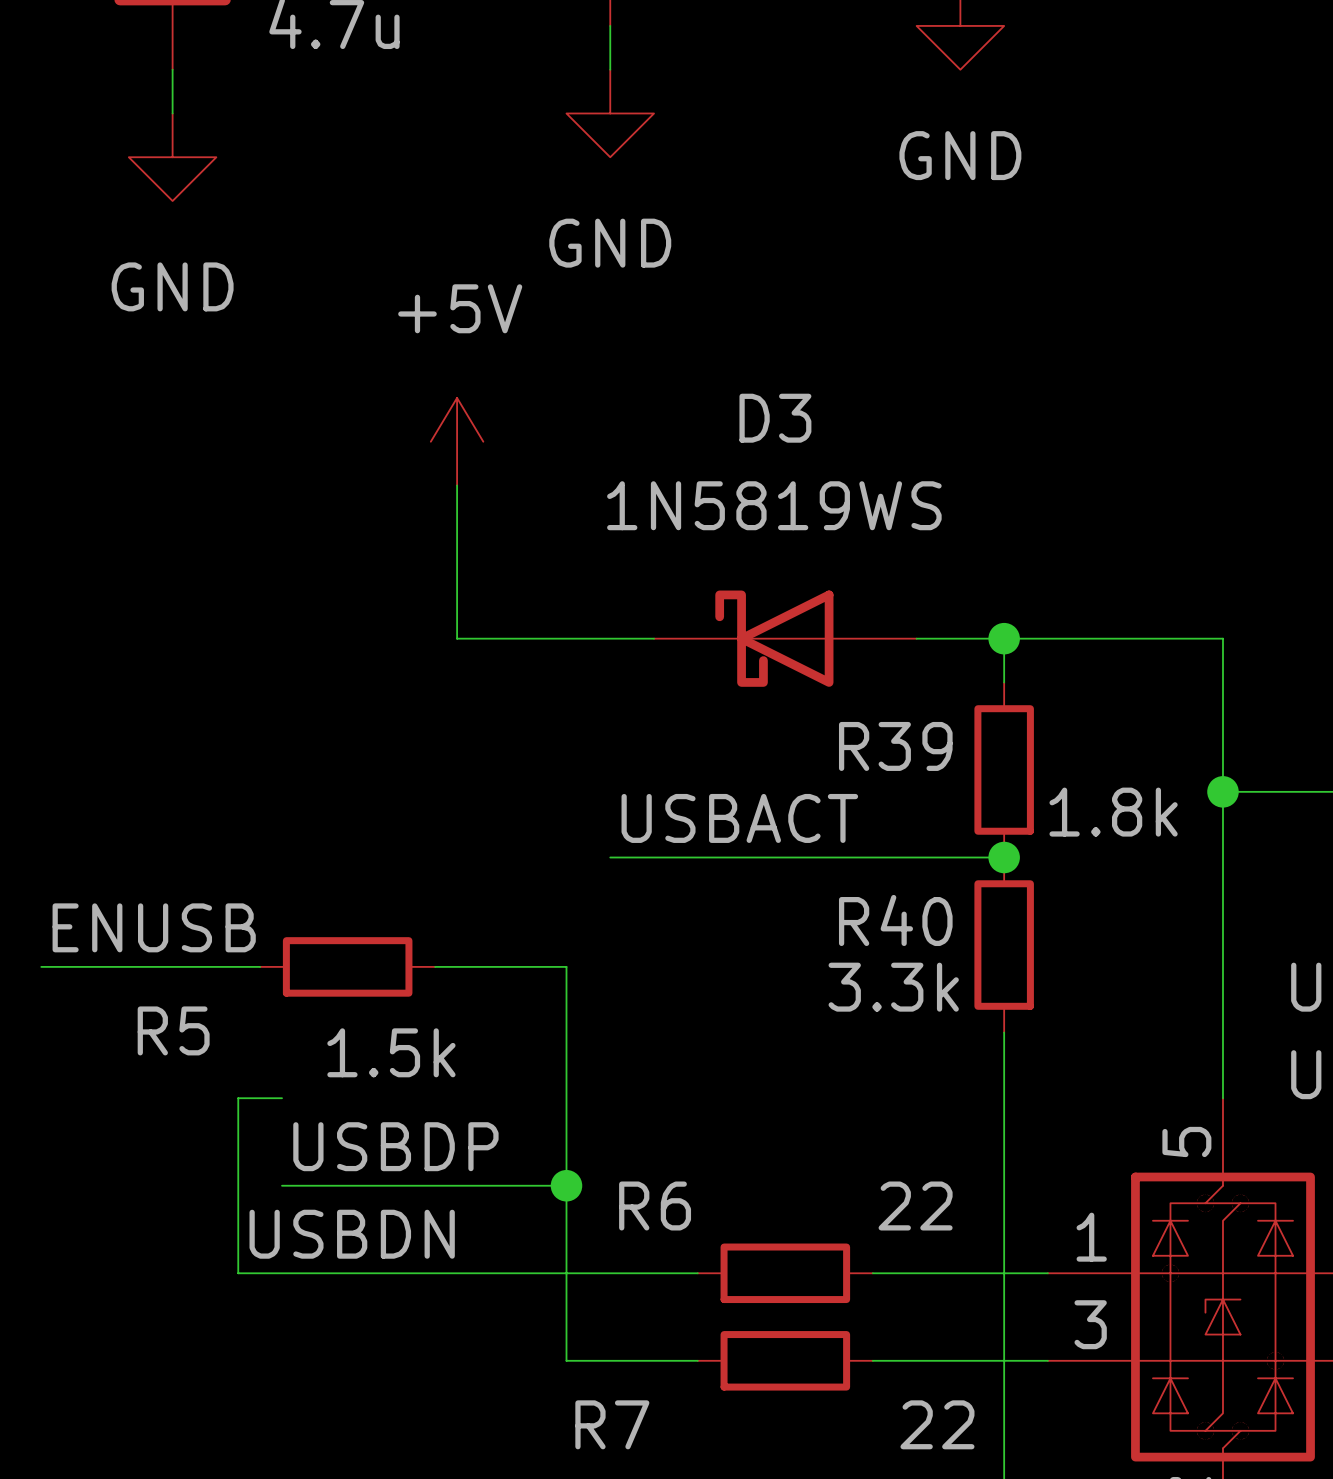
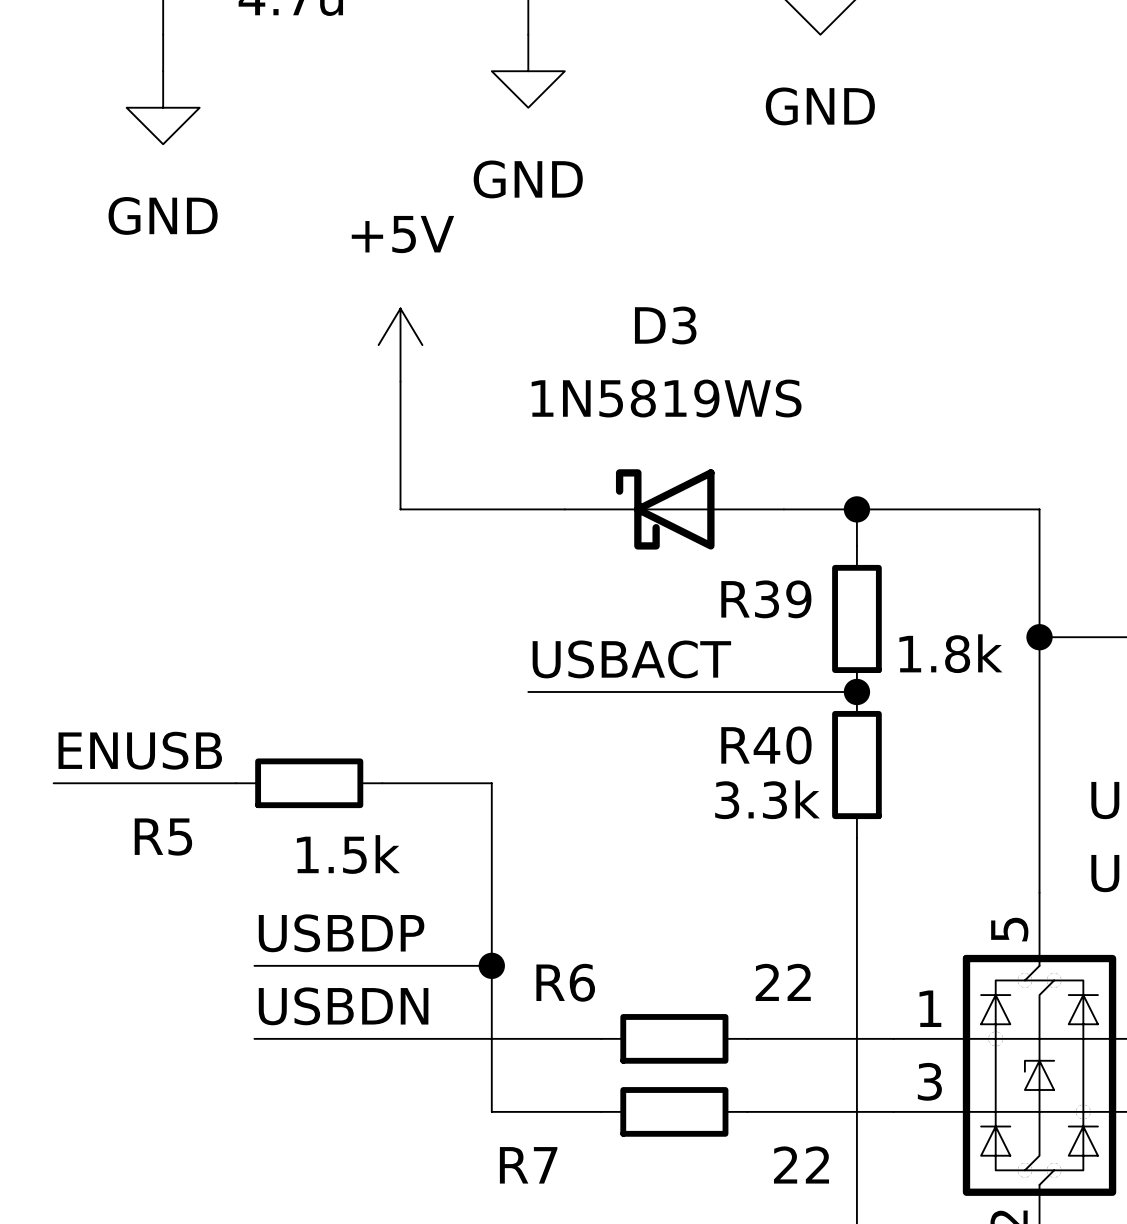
wire: (282, 1098) (238, 1098) (238, 1273) (282, 1273) -> none
label position: USBDN (352, 1234) -> USBDN (343, 1006)

